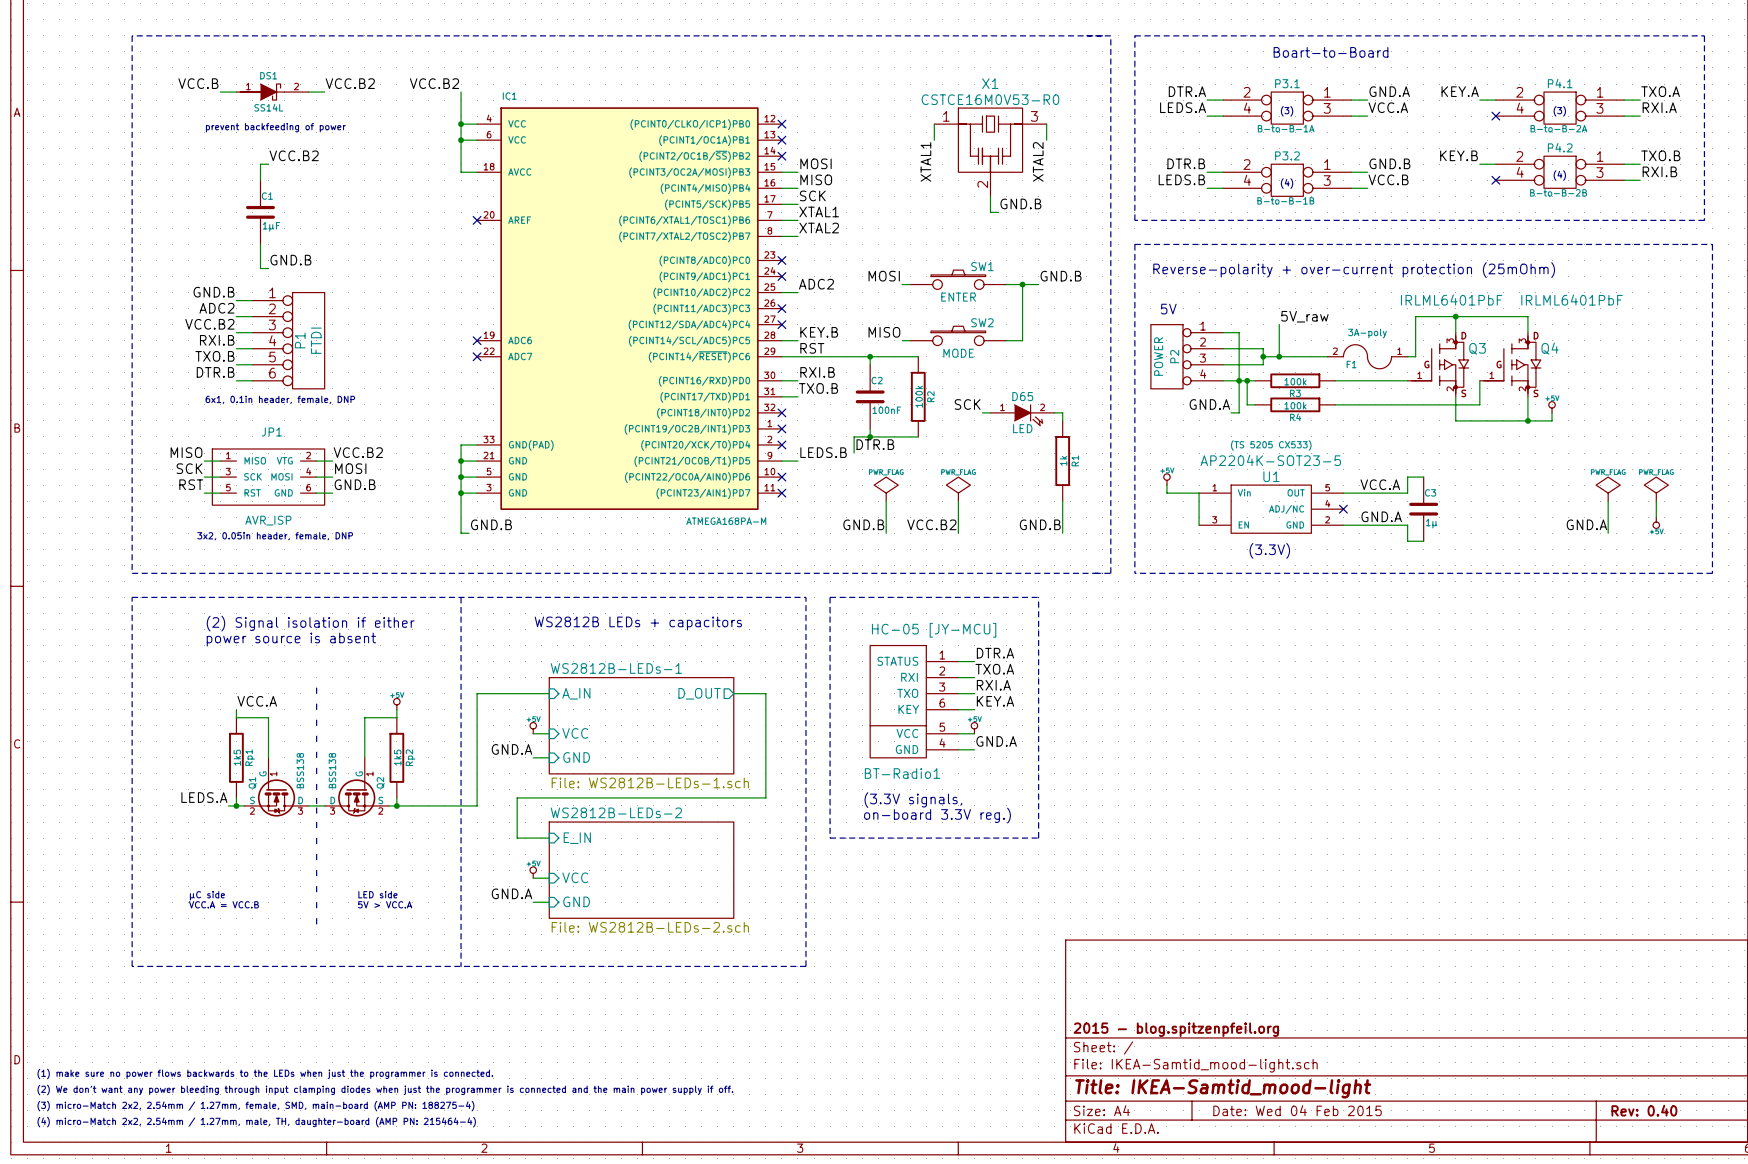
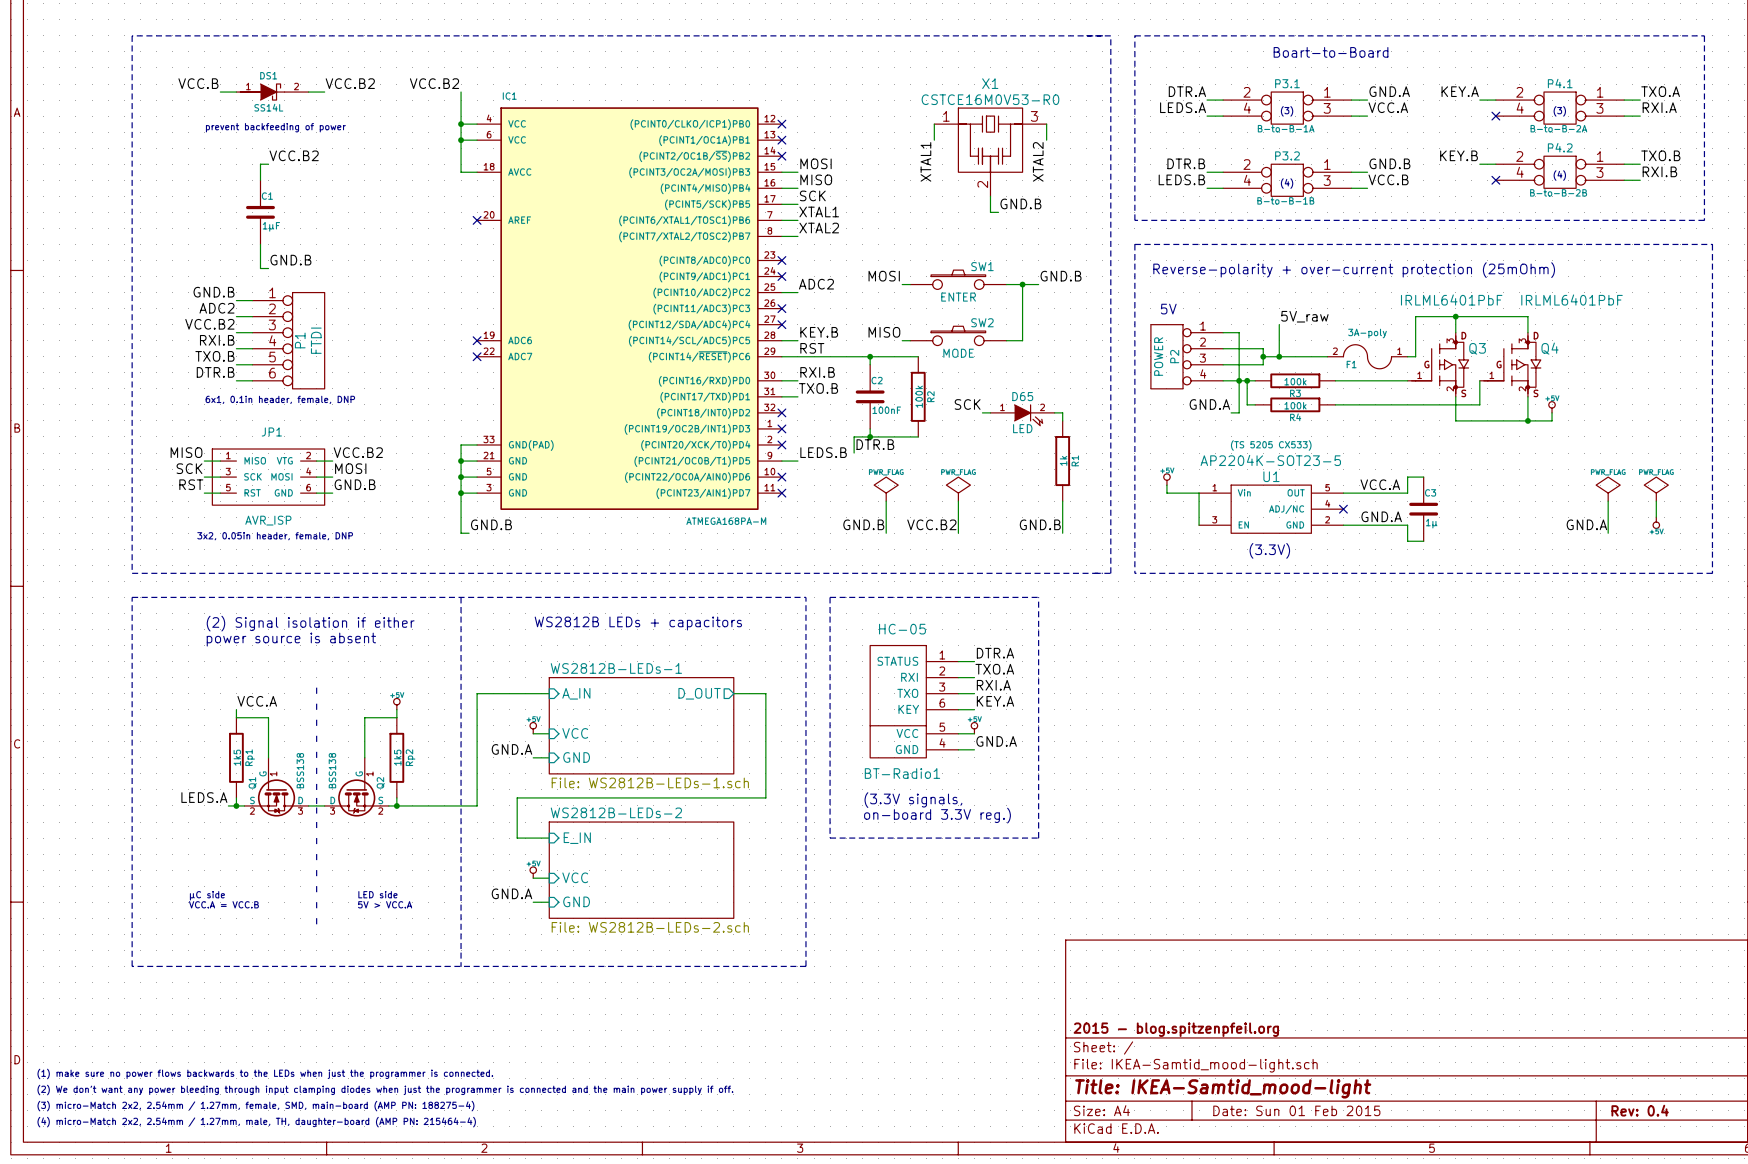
BT-Radio1 value: HC-05 [JY-MCU] (934, 630) -> HC-05 (902, 629)
title block: Date: Wed 04 Feb 2015 (1297, 1110) -> Date: Sun 01 Feb 2015 (1296, 1110)
title block: Rev: 0.40 (1644, 1110) -> Rev: 0.4 (1640, 1110)

